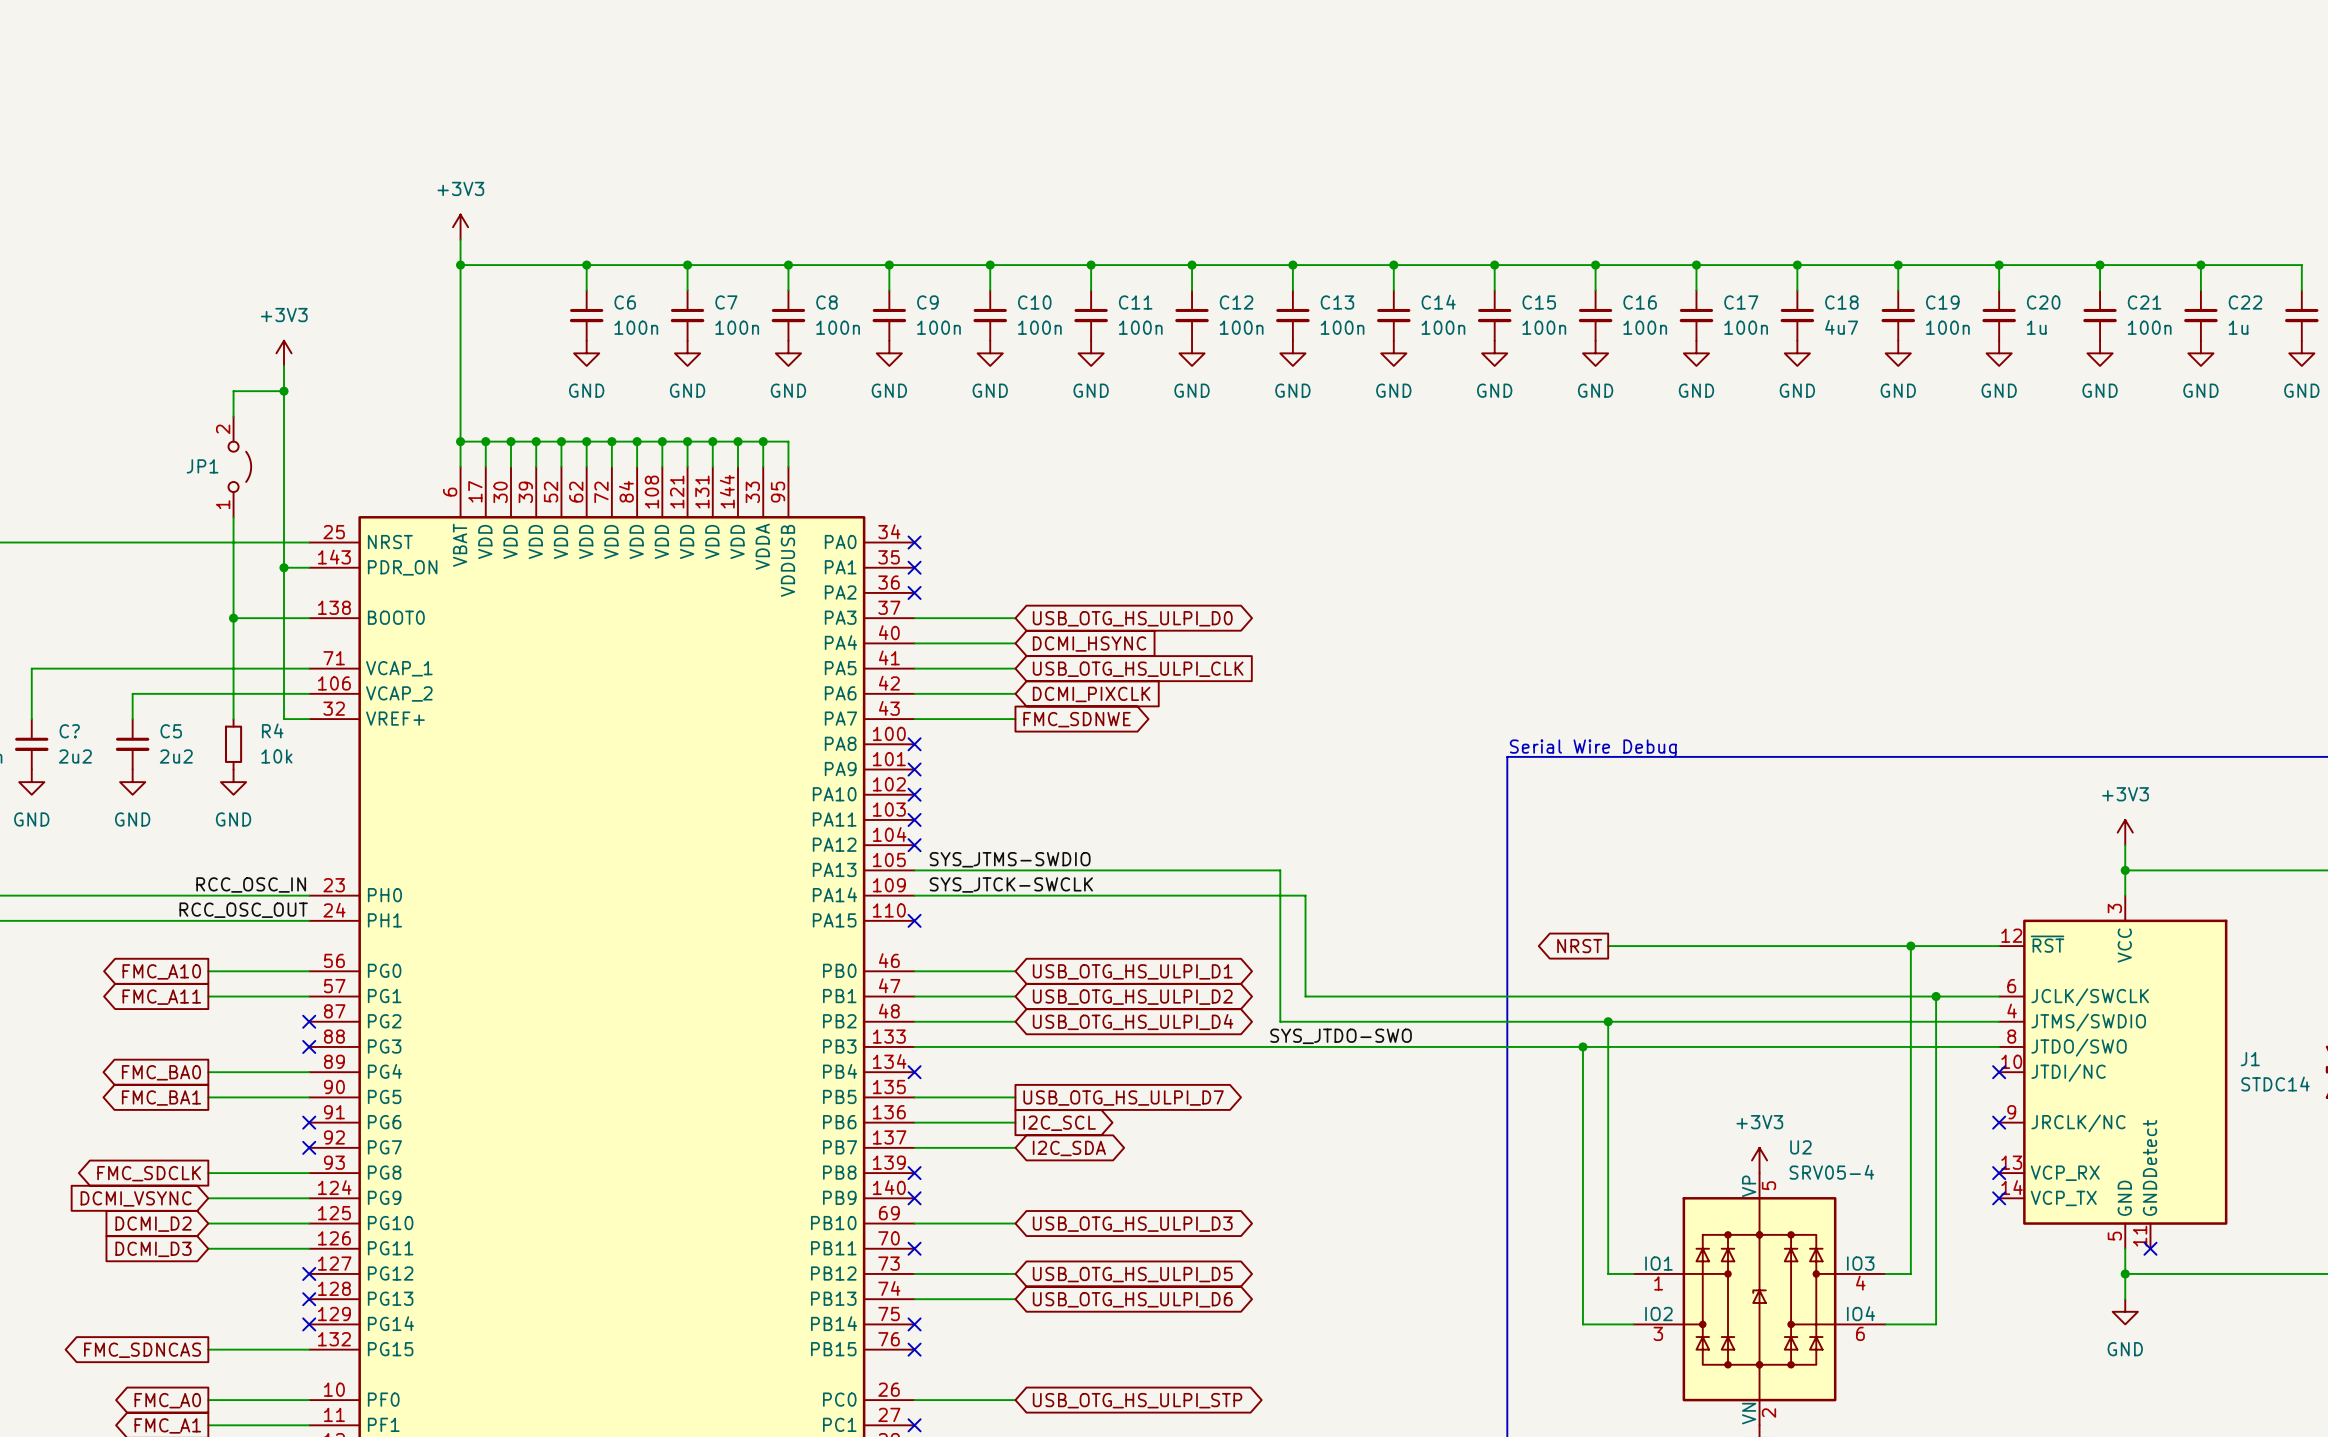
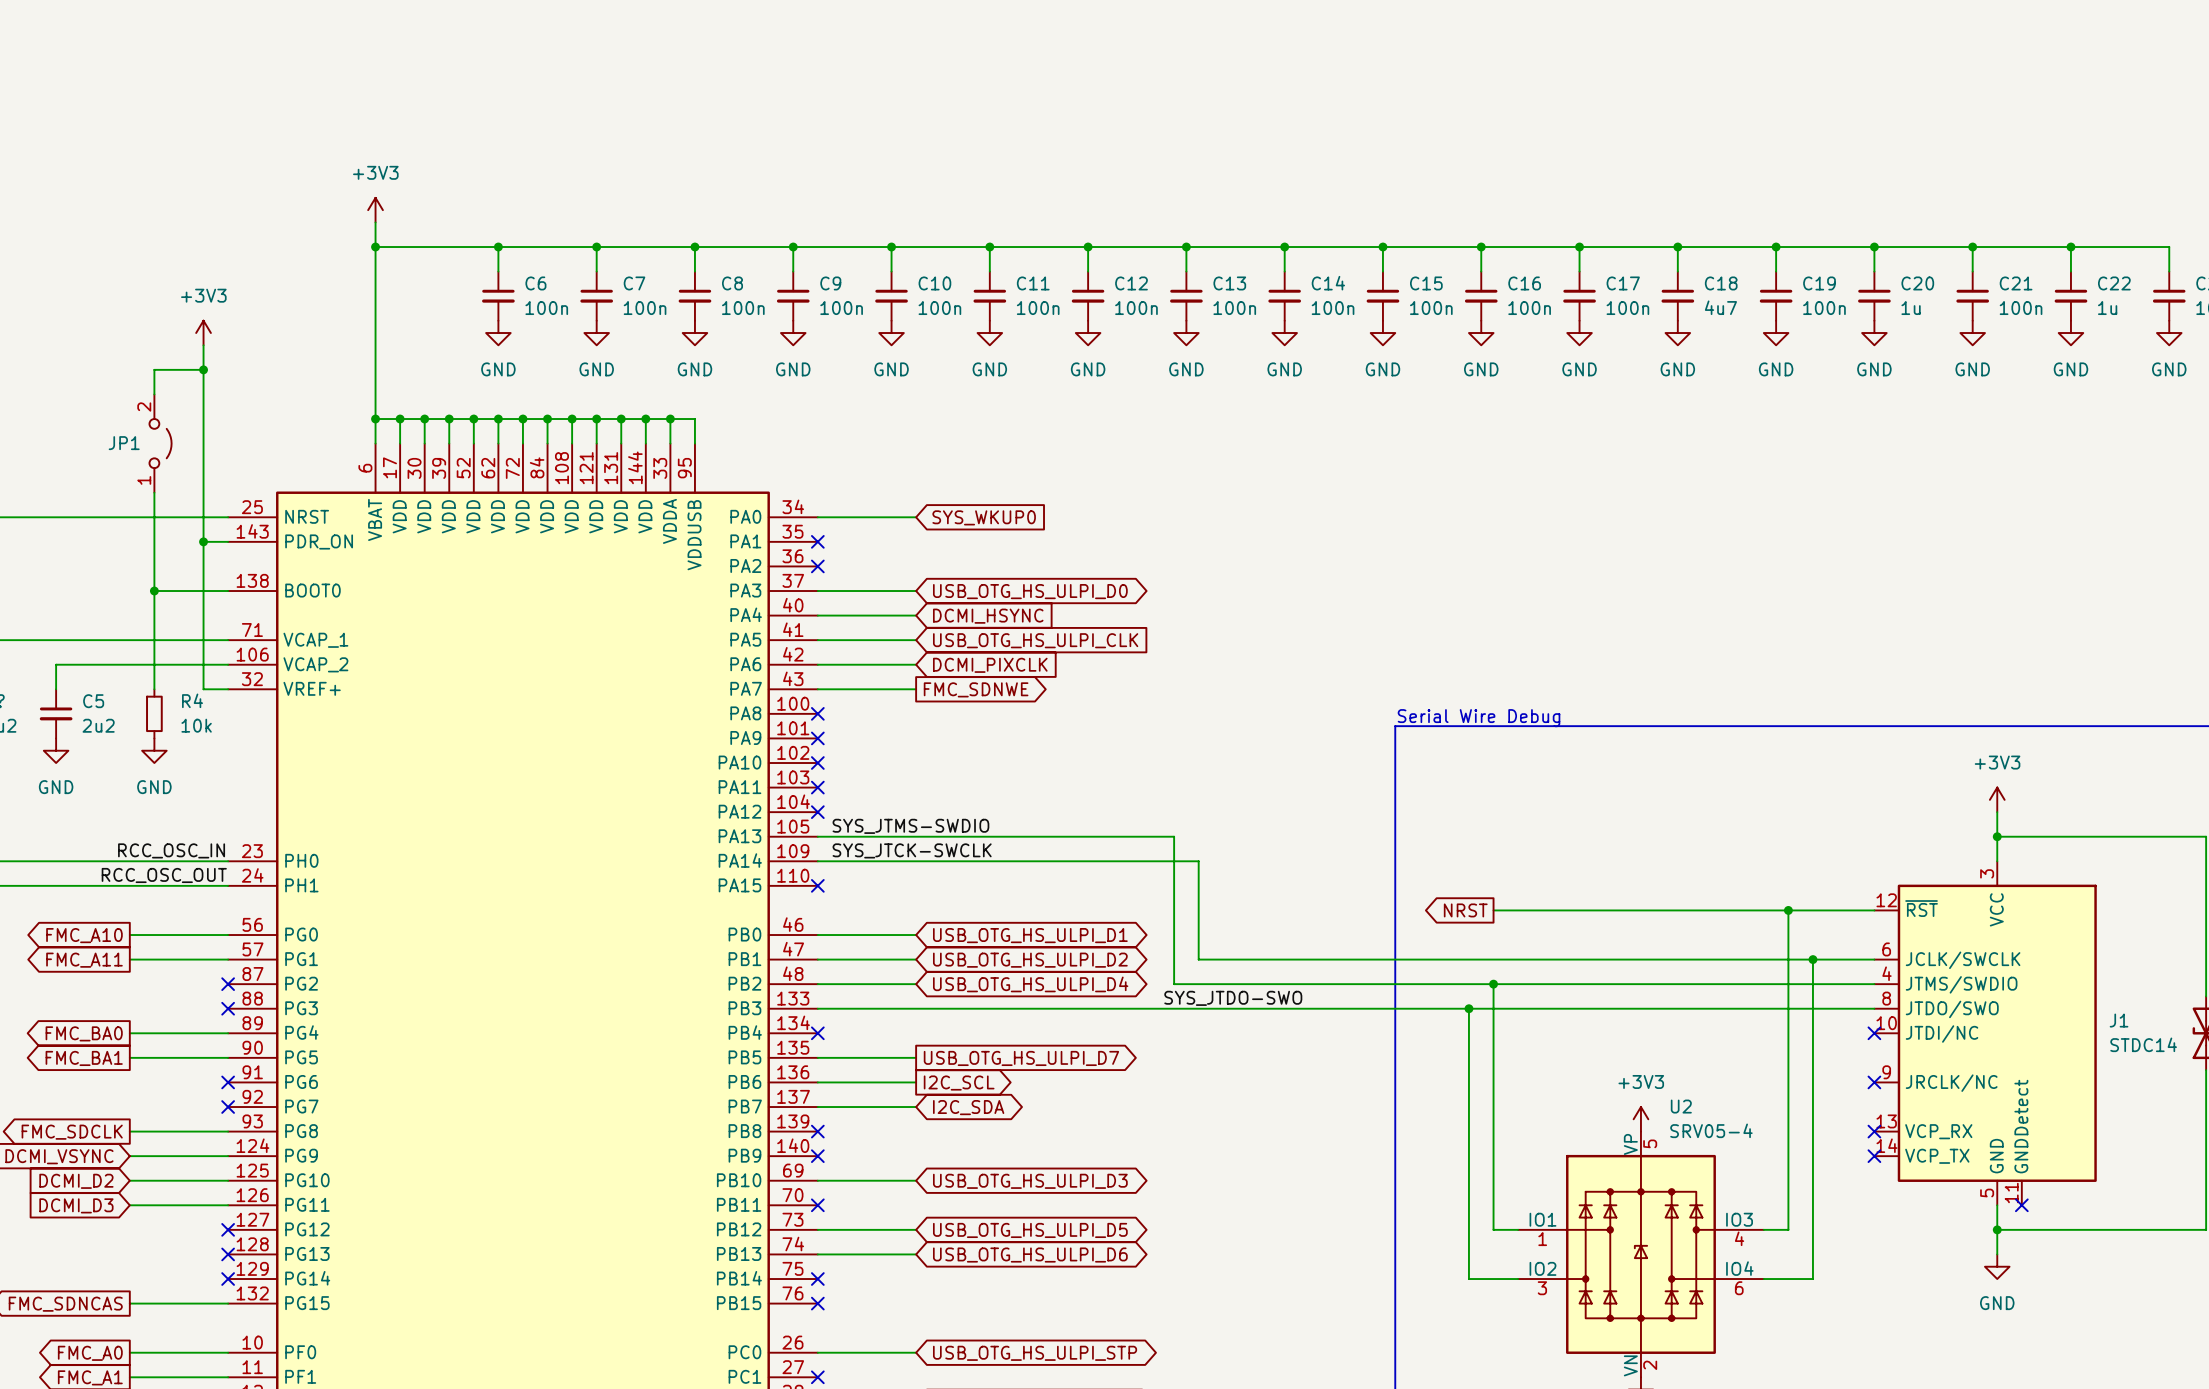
wire: none -> (817, 517) (916, 517)
no-connect mark: (914, 542) -> none
global label: none -> SYS_WKUP0 (984, 517)

